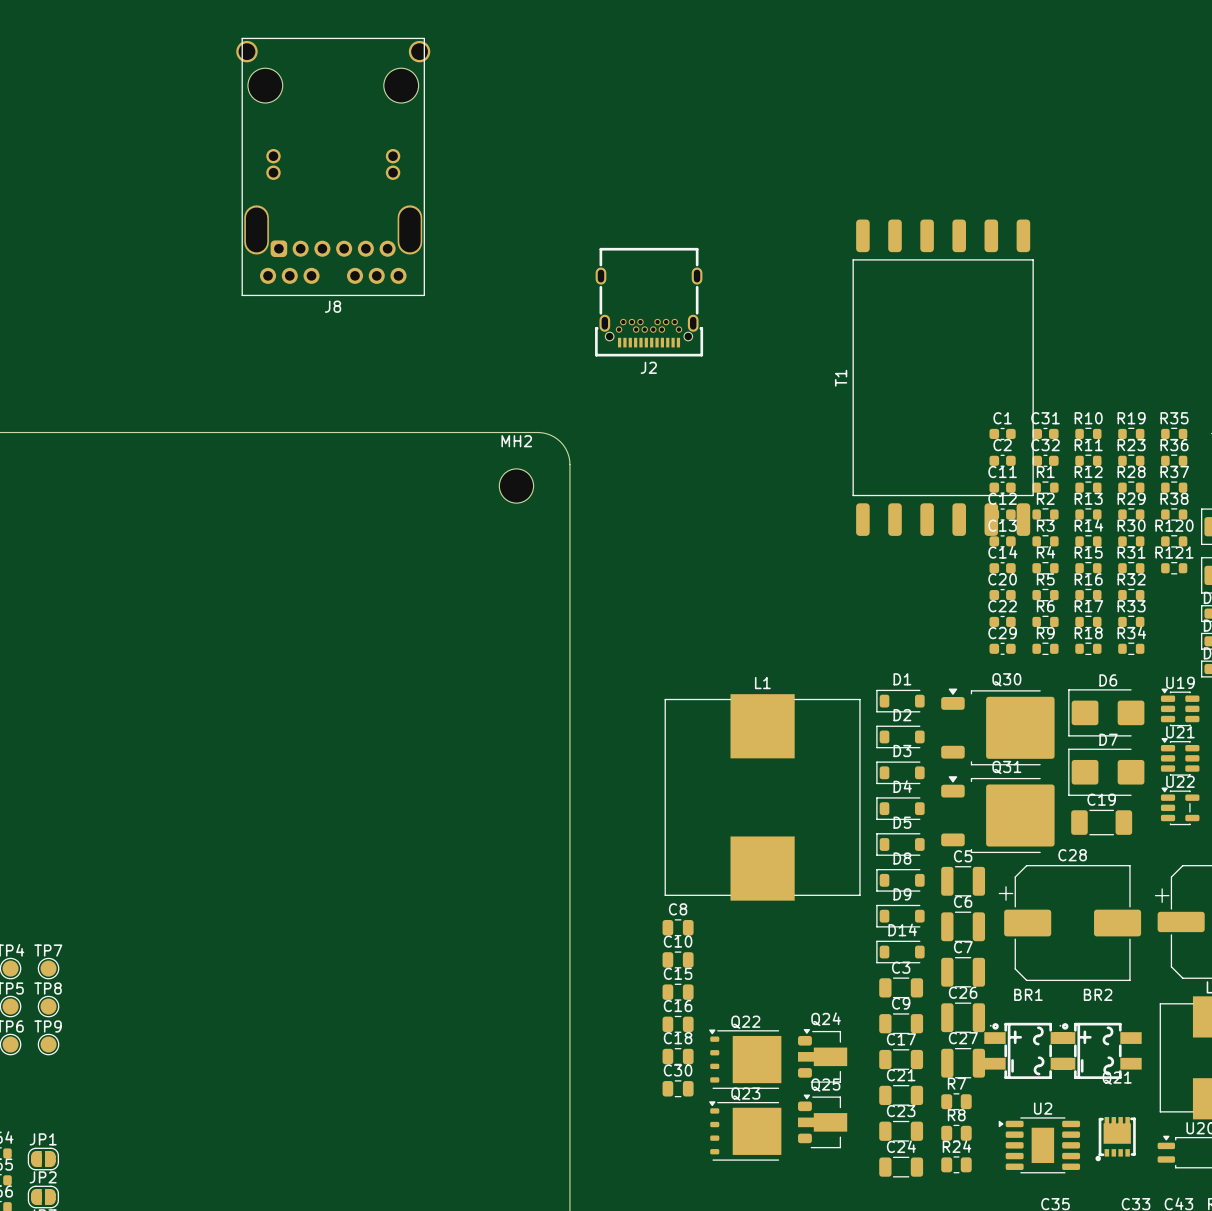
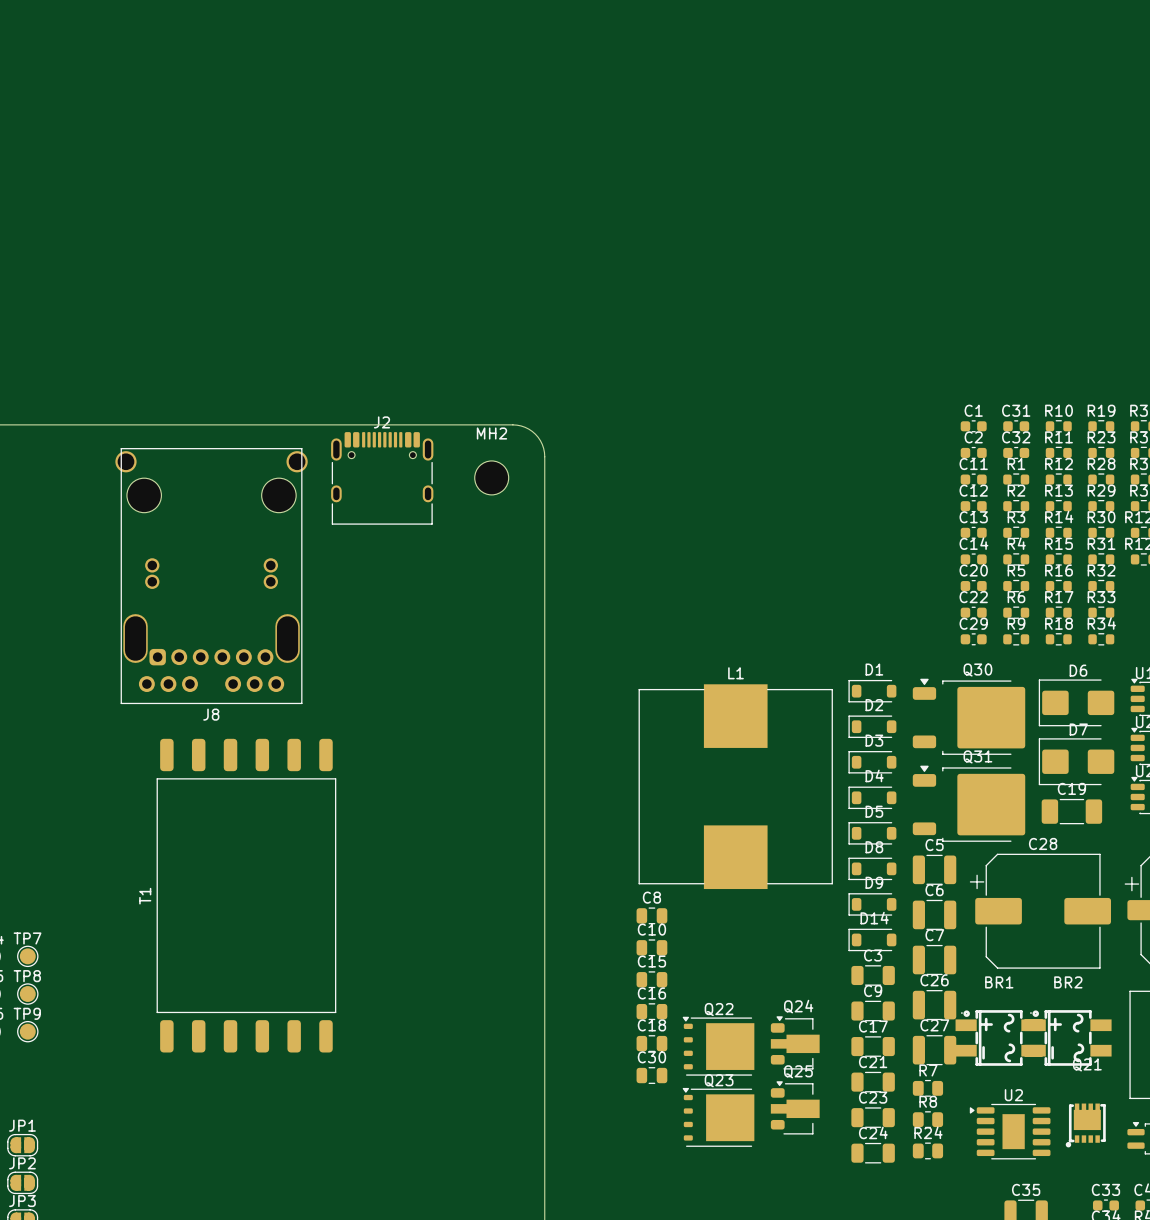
J8 position: (333, 166) -> (211, 576)
J2 footprint: [595, 247, 704, 357] -> [331, 432, 434, 525]
J2 name position: J2 (648, 367) -> J2 (381, 422)
T1 position: (943, 377) -> (246, 895)

